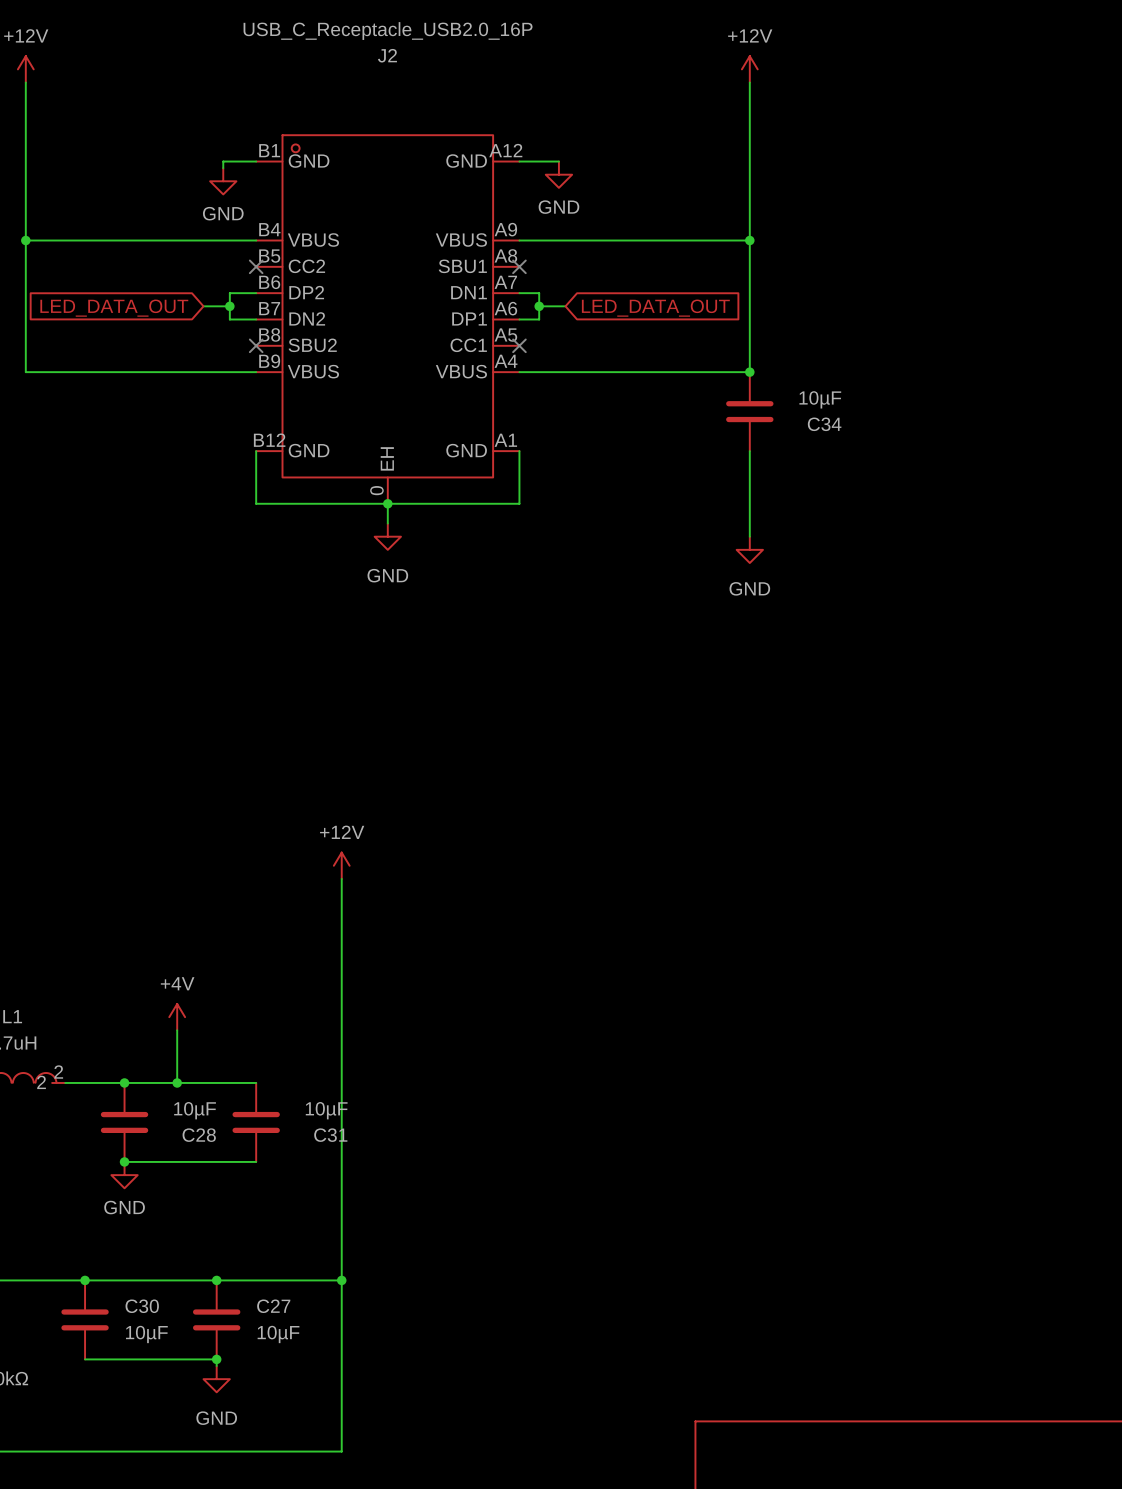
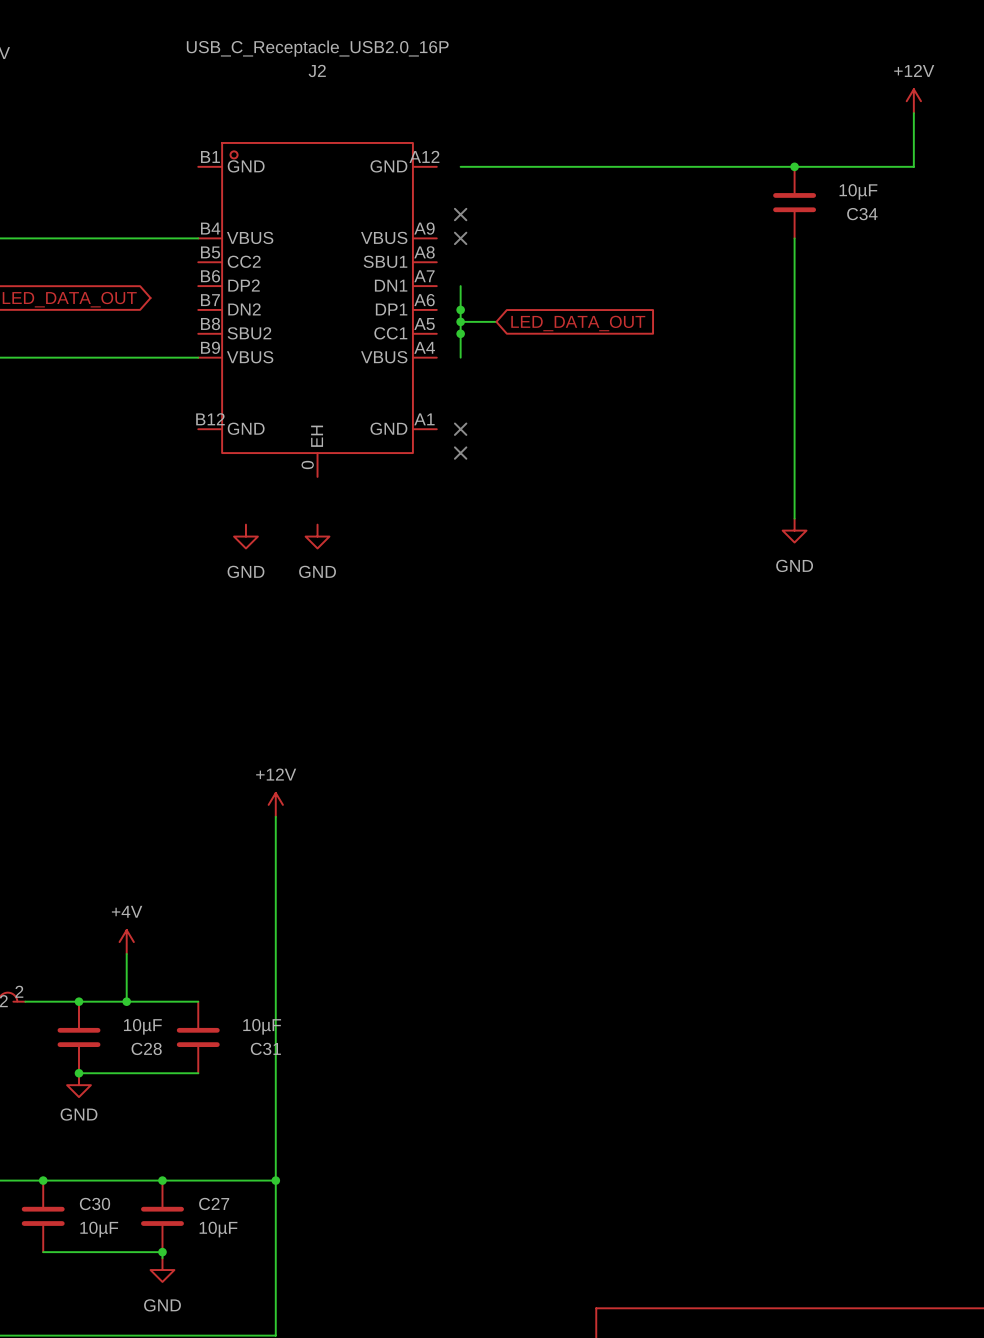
power symbol: +12V (749, 69) -> none
wire: (749, 82) (749, 372) (519, 372) -> none
power symbol: none -> +12V (913, 101)
wire: none -> (913, 113) (913, 166) (472, 166)
wire: (256, 161) (223, 161) (223, 168) -> none
wire: (519, 161) (545, 161) -> none
junction: none -> (794, 166)
power symbol: GND (558, 174) -> none
power symbol: GND (223, 181) -> none
no-connect mark: none -> (460, 214)
wire: (519, 240) (749, 240) -> none
no-connect mark: none -> (460, 238)
junction: (749, 240) -> none
wire: none -> (794, 238) (794, 518)
no-connect mark: (256, 266) -> none
no-connect mark: (519, 266) -> none
wire: (256, 293) (229, 293) (229, 319) (256, 319) -> none
wire: (519, 293) (539, 293) (539, 319) (519, 319) -> none
wire: none -> (460, 286) (460, 357)
wire: (203, 306) (229, 306) -> none
junction: (229, 306) -> none
wire: (539, 306) (565, 306) -> none
junction: (539, 306) -> none
global label position: LED_DATA_OUT (655, 308) -> LED_DATA_OUT (578, 323)
junction: none -> (460, 309)
wire: none -> (460, 321) (496, 321)
junction: none -> (460, 321)
no-connect mark: (256, 345) -> none
no-connect mark: (519, 345) -> none
junction: none -> (460, 333)
junction: (749, 372) -> none
C34 position: (749, 411) -> (794, 202)
wire: (256, 451) (256, 503) (519, 503) (519, 451) -> none
no-connect mark: none -> (460, 429)
wire: (749, 451) (749, 536) -> none
no-connect mark: none -> (460, 453)
wire: (387, 503) (387, 523) -> none
junction: (387, 503) -> none
power symbol position: GND (387, 536) -> GND (317, 536)
power symbol position: GND (749, 549) -> GND (794, 530)
power symbol: none -> GND (245, 536)

